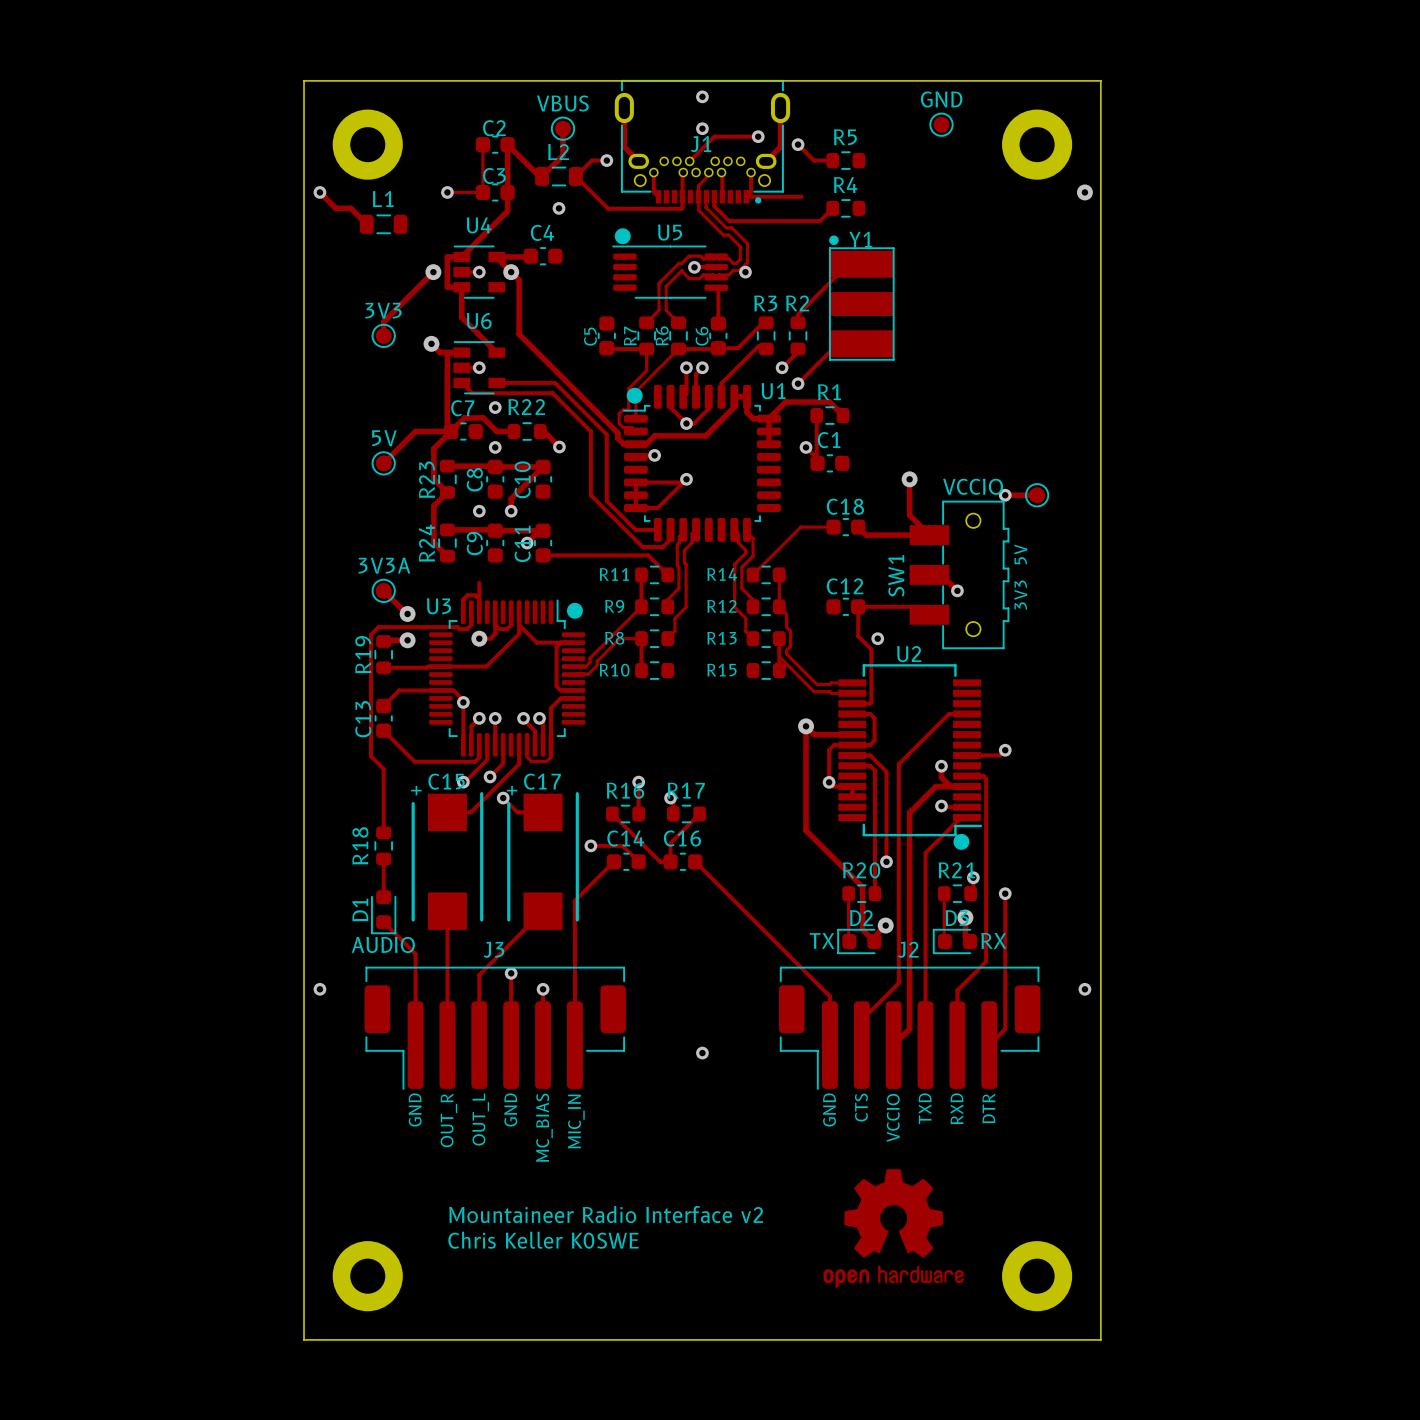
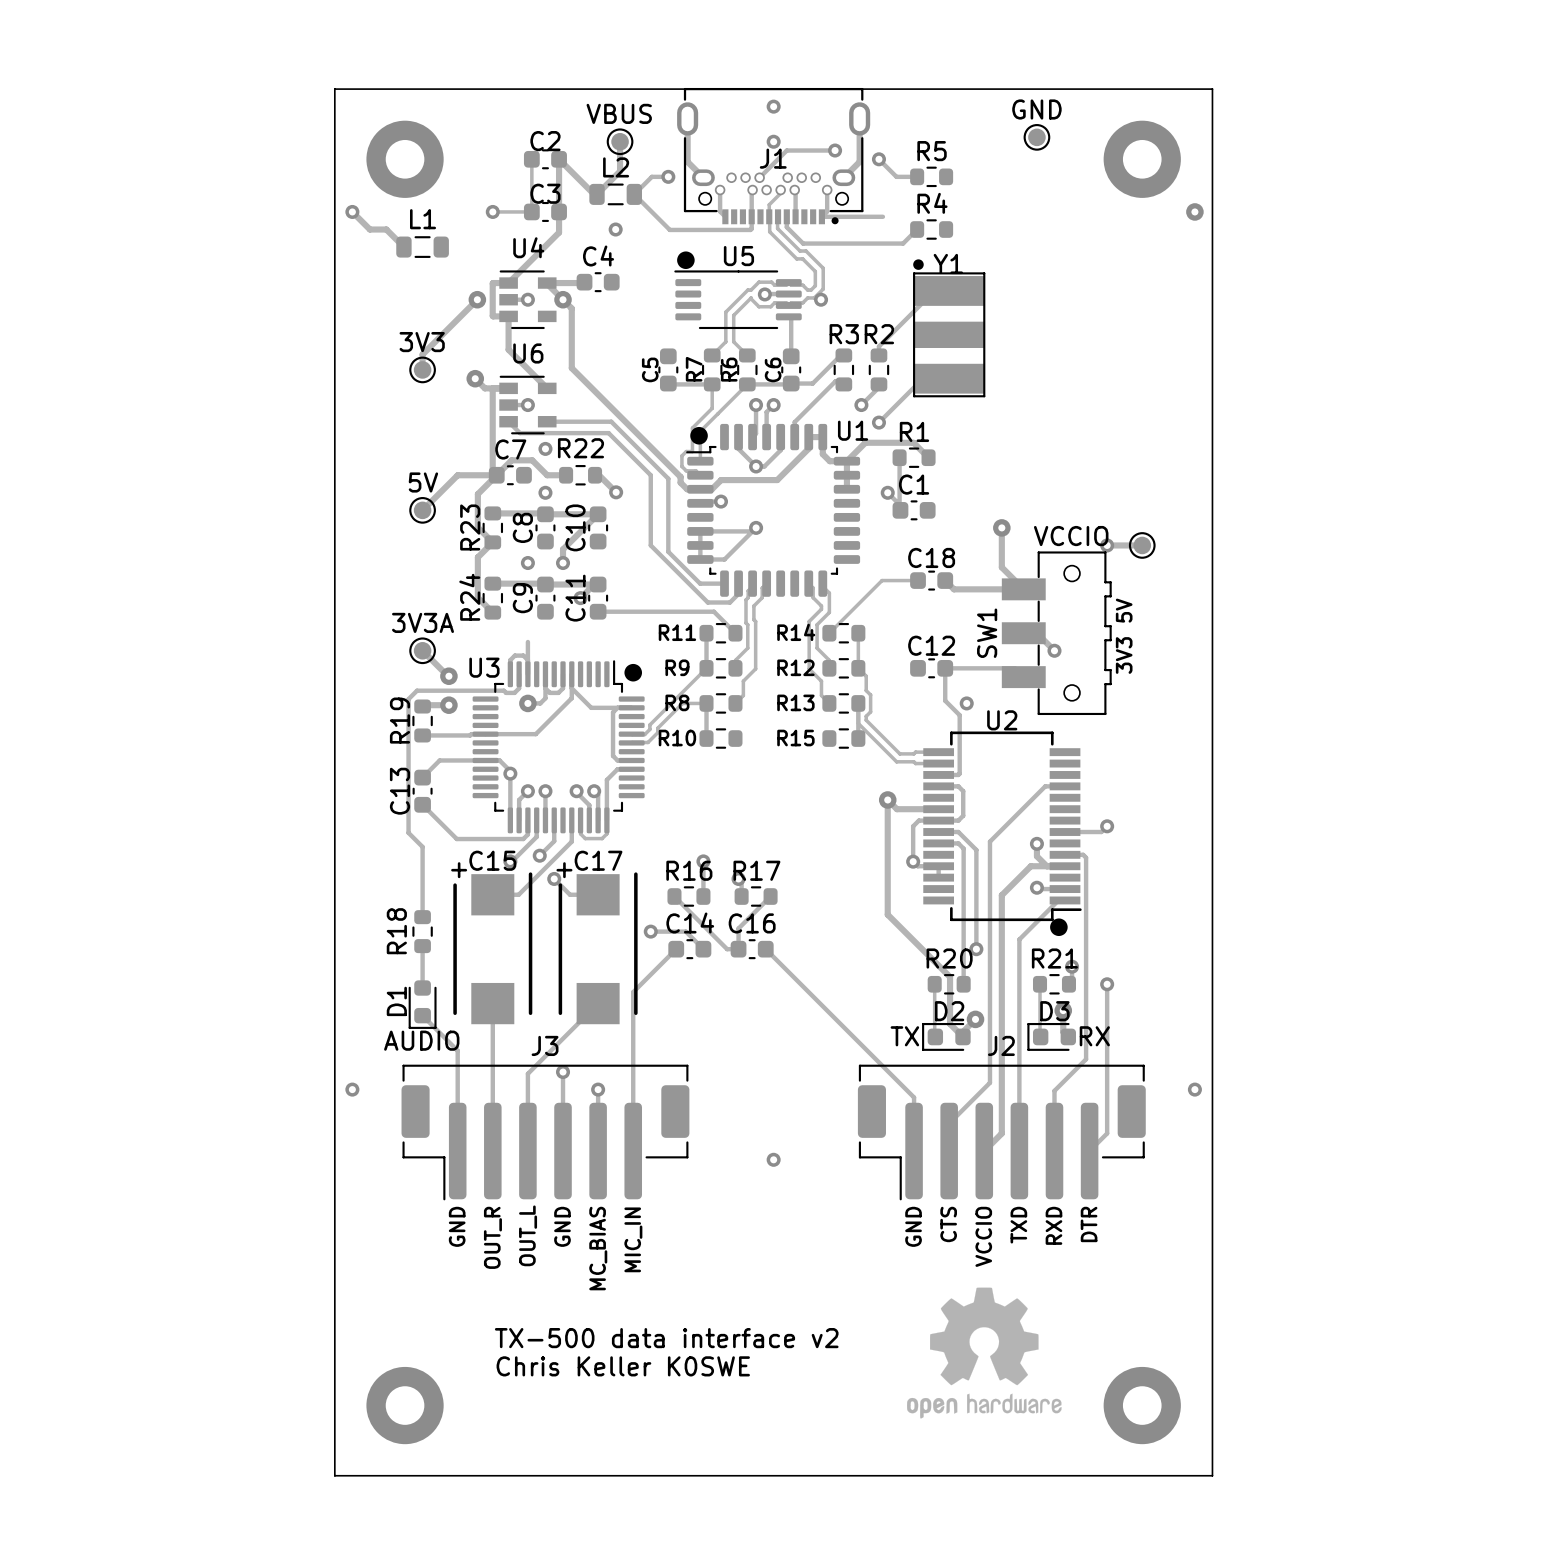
text: Mountaineer Radio Interface v2 (606, 1214) -> TX-500 data interface v2 (666, 1338)

